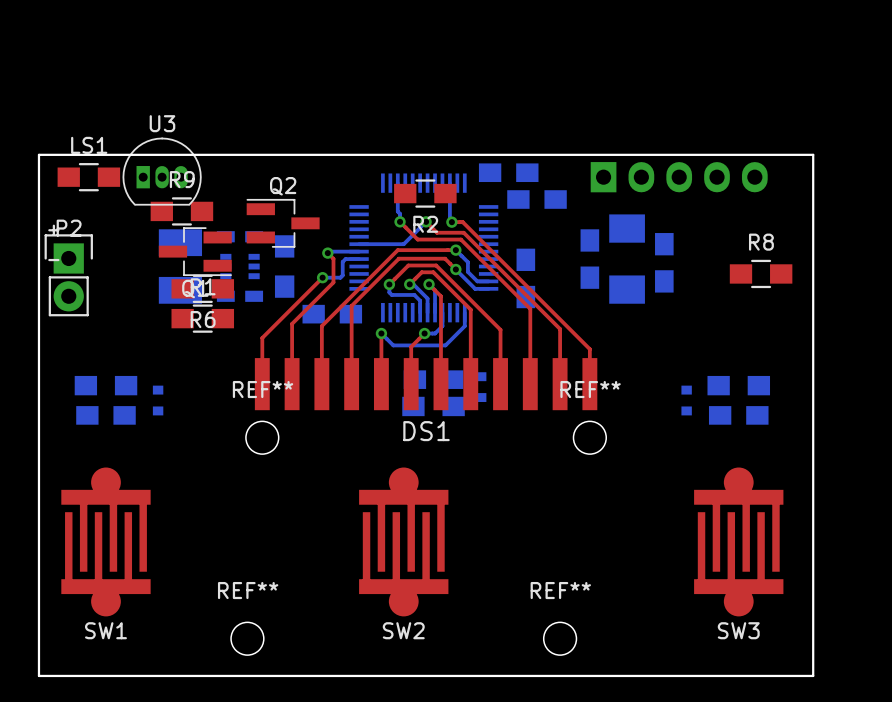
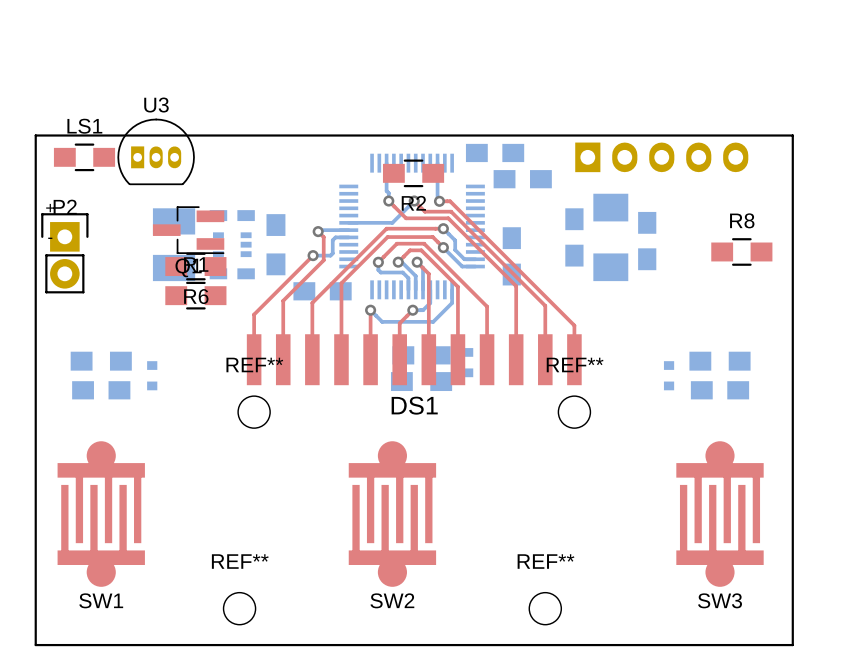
R9: (181, 211) -> none
Q2: (283, 223) -> none

